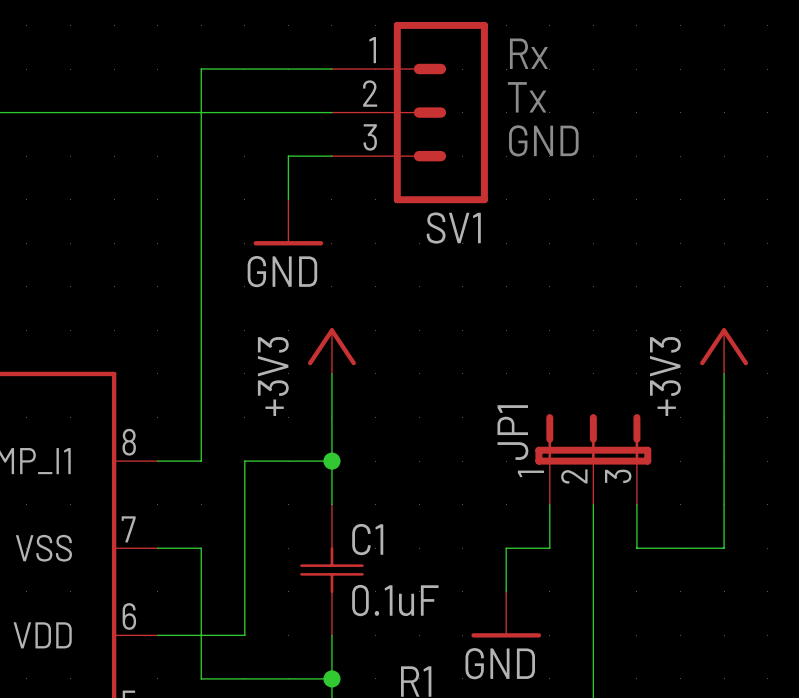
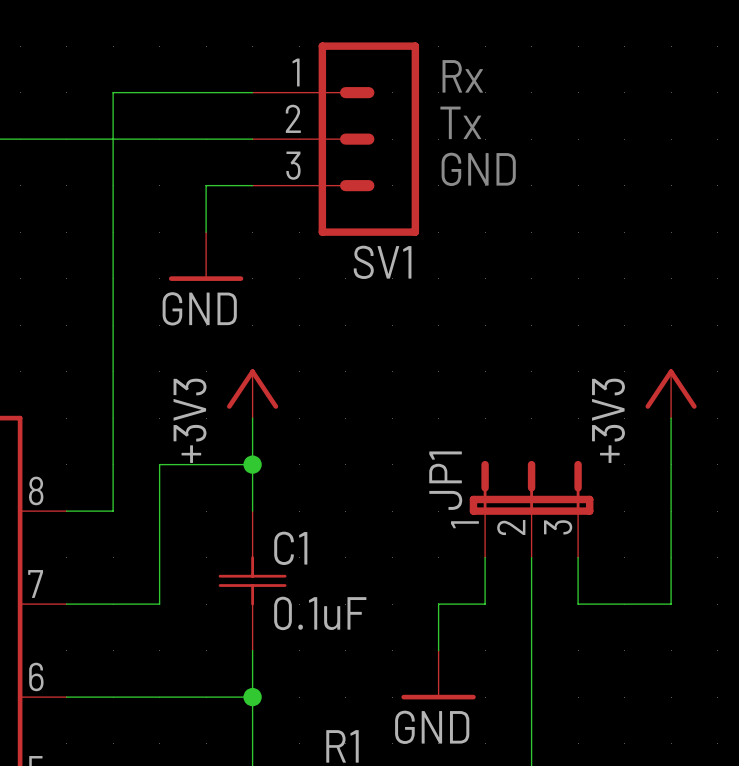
wire: (244, 461) (331, 461) (331, 504) -> (159, 511) (159, 464) (252, 464)
junction position: (331, 461) -> (252, 464)
wire: (201, 548) (201, 678) (331, 678) -> (113, 604) (159, 604)
wire: (244, 548) (244, 635) -> (252, 650) (252, 697) (159, 697)
C1 position: (331, 570) -> (252, 580)
junction position: (331, 678) -> (252, 697)

